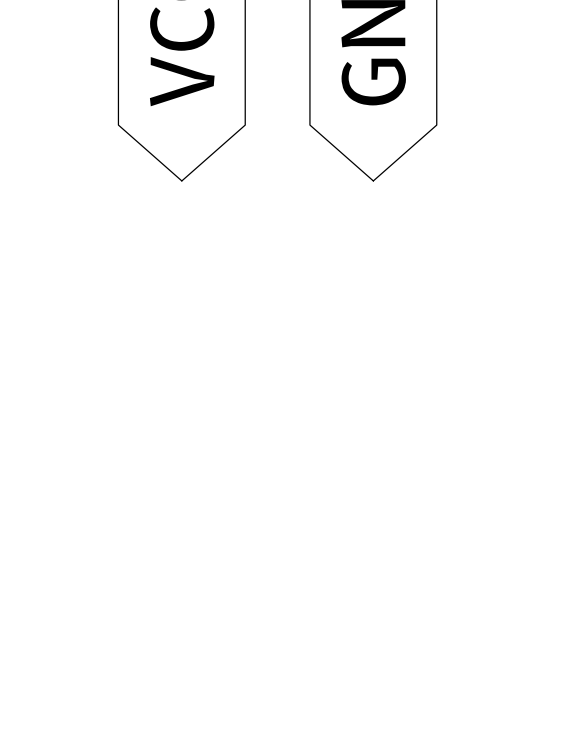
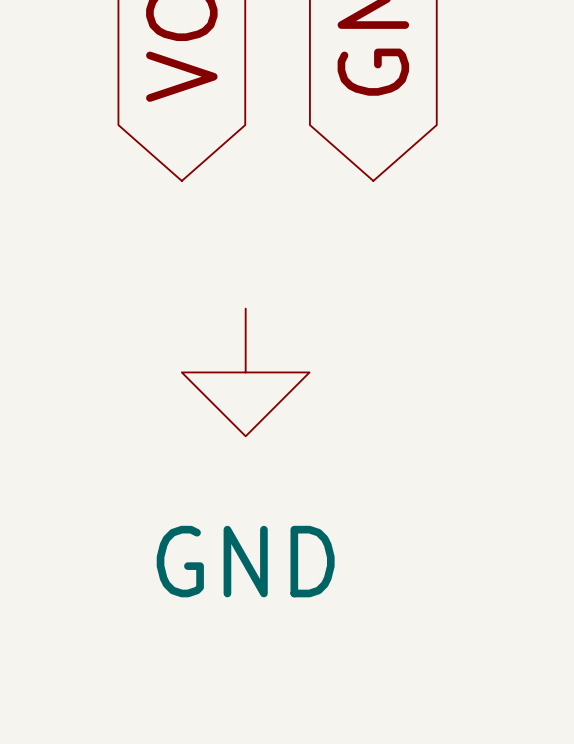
power symbol: none -> GND (245, 372)

